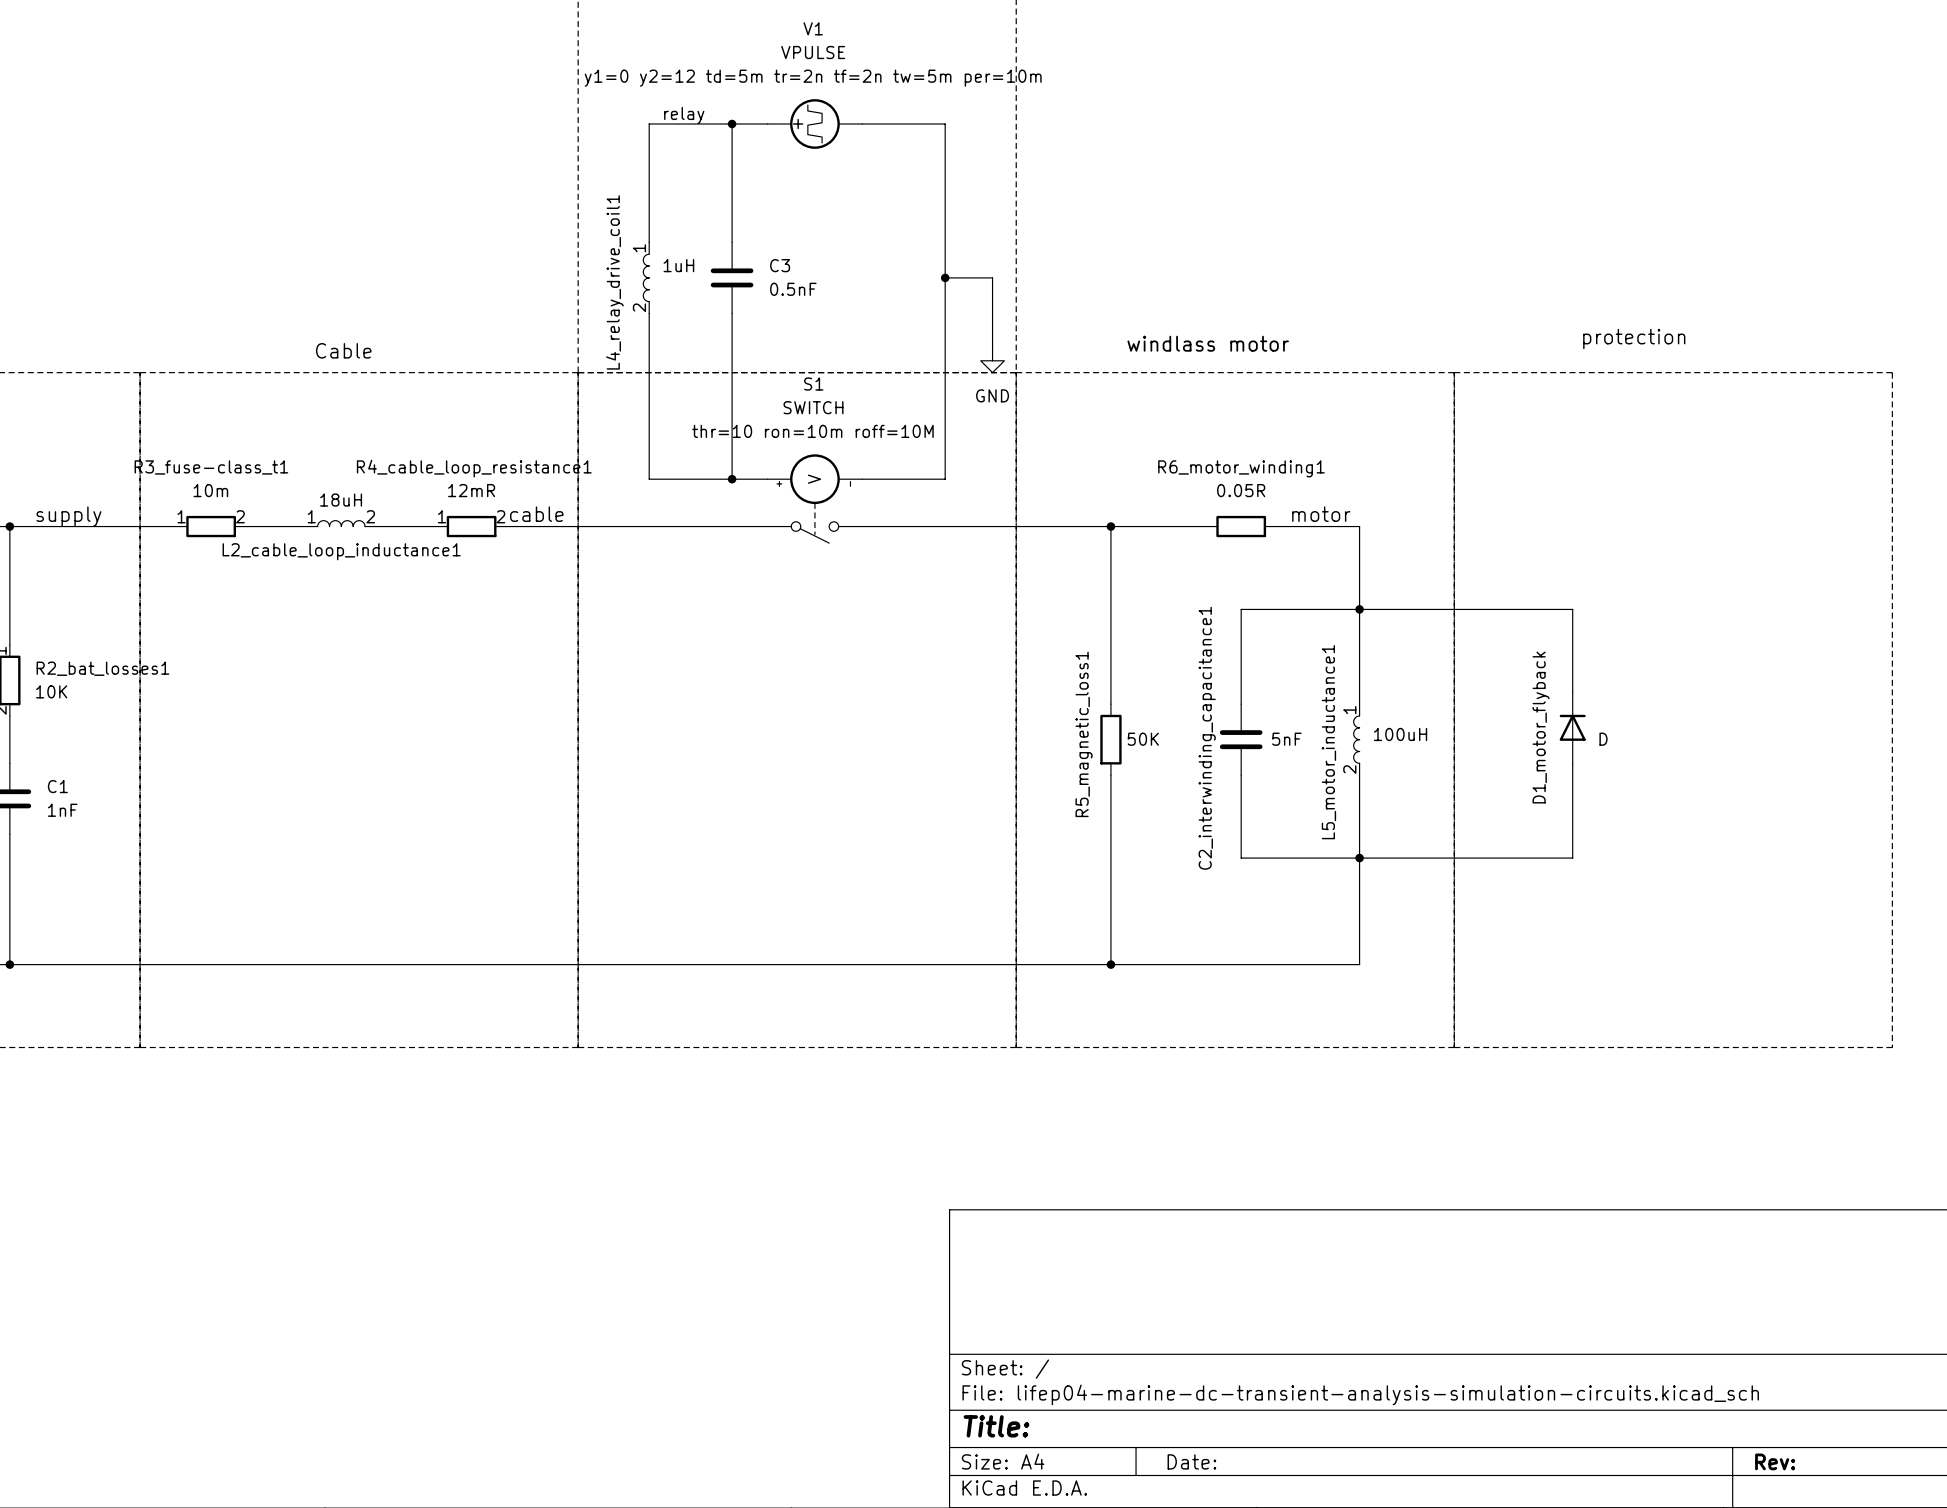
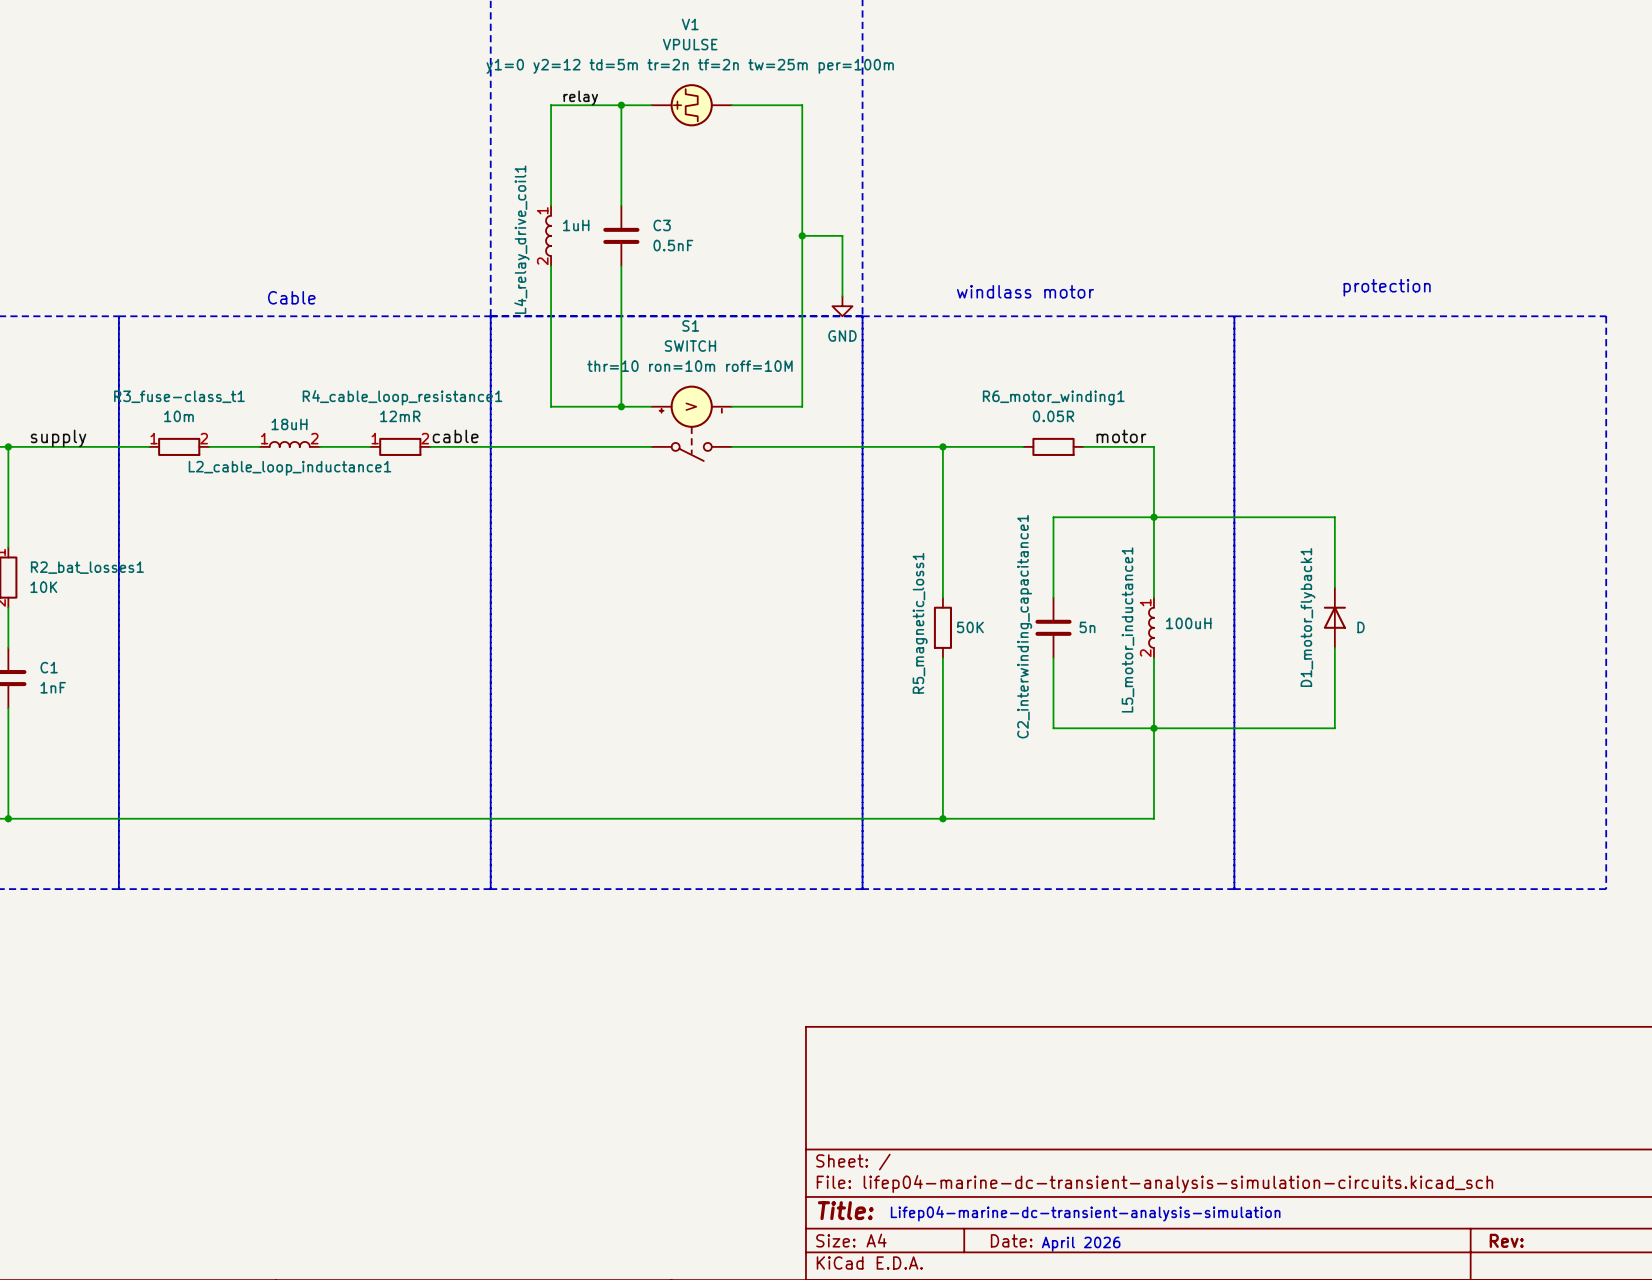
V1 text: y1=0 y2=12 td=5m tr=2n tf=2n tw=5m per=10m (813, 78) -> y1=0 y2=12 td=5m tr=2n tf=2n tw=25m per=100m (690, 66)
D1_motor_flyback name: D1_motor_flyback (1541, 727) -> D1_motor_flyback1 (1308, 617)
C2_interwinding_capacitance1 value: 5nF (1286, 739) -> 5n (1087, 627)
text: none -> Lifep04-marine-dc-transient-analysis-simulation (1085, 1213)
text: none -> April 2026 (1081, 1244)

